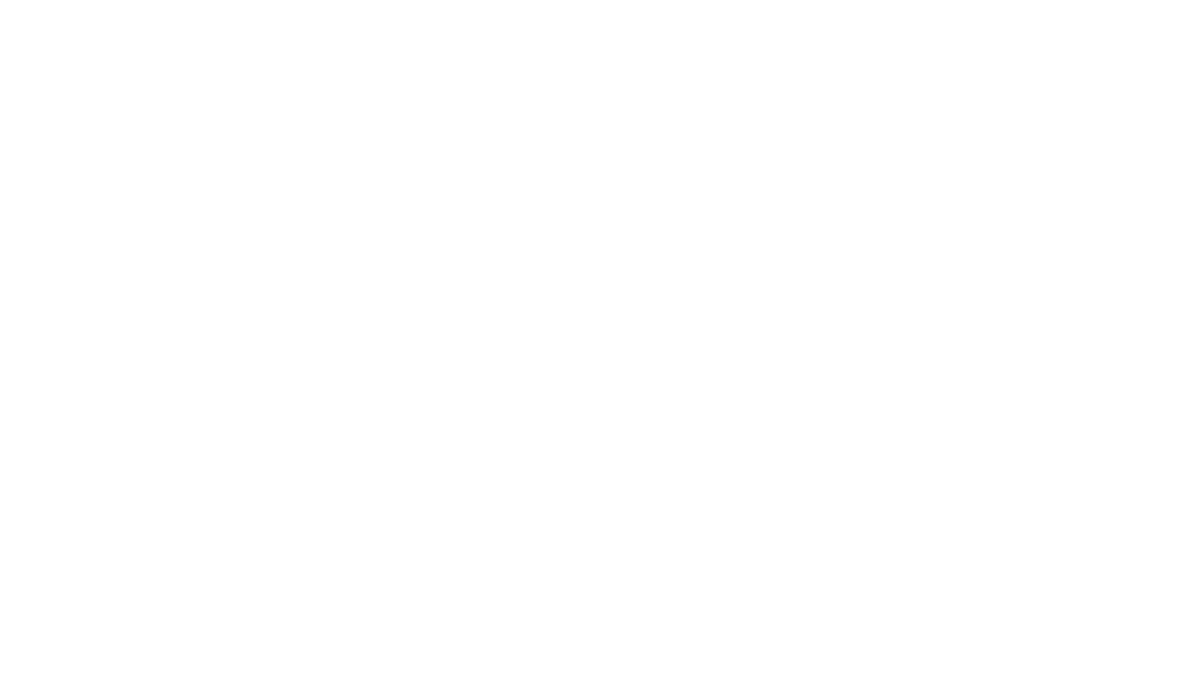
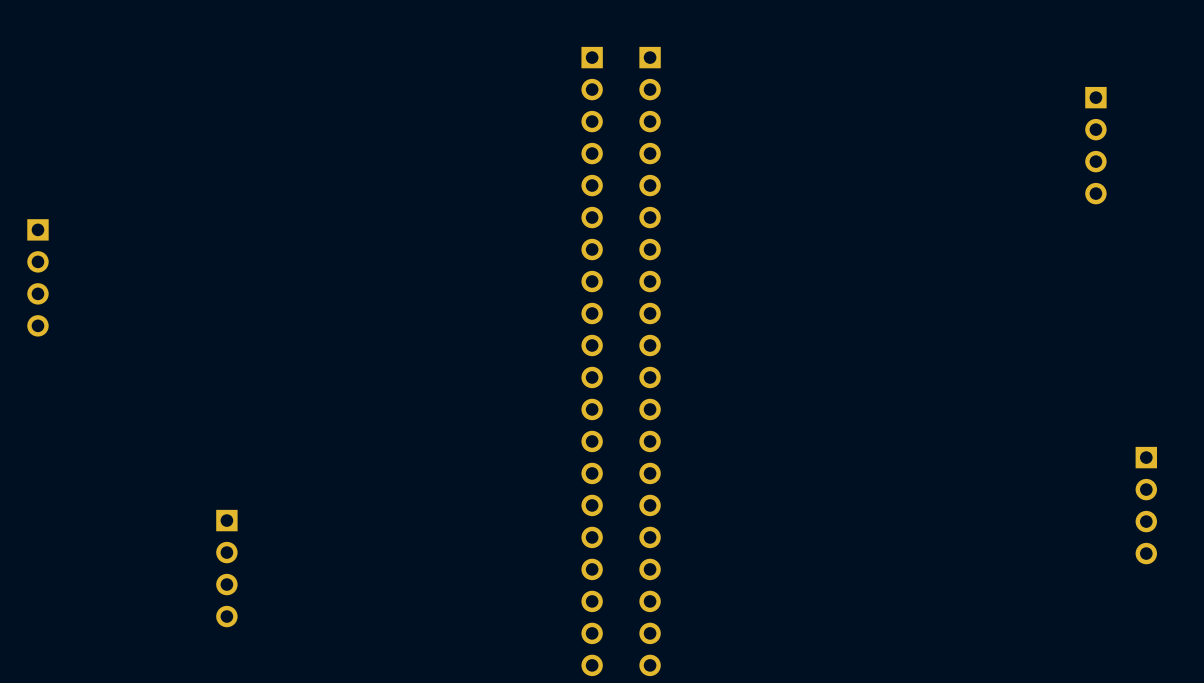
part: none -> (1095, 145)
part: none -> (37, 277)
part: none -> (592, 361)
part: none -> (650, 361)
part: none -> (1146, 505)
part: none -> (226, 568)

